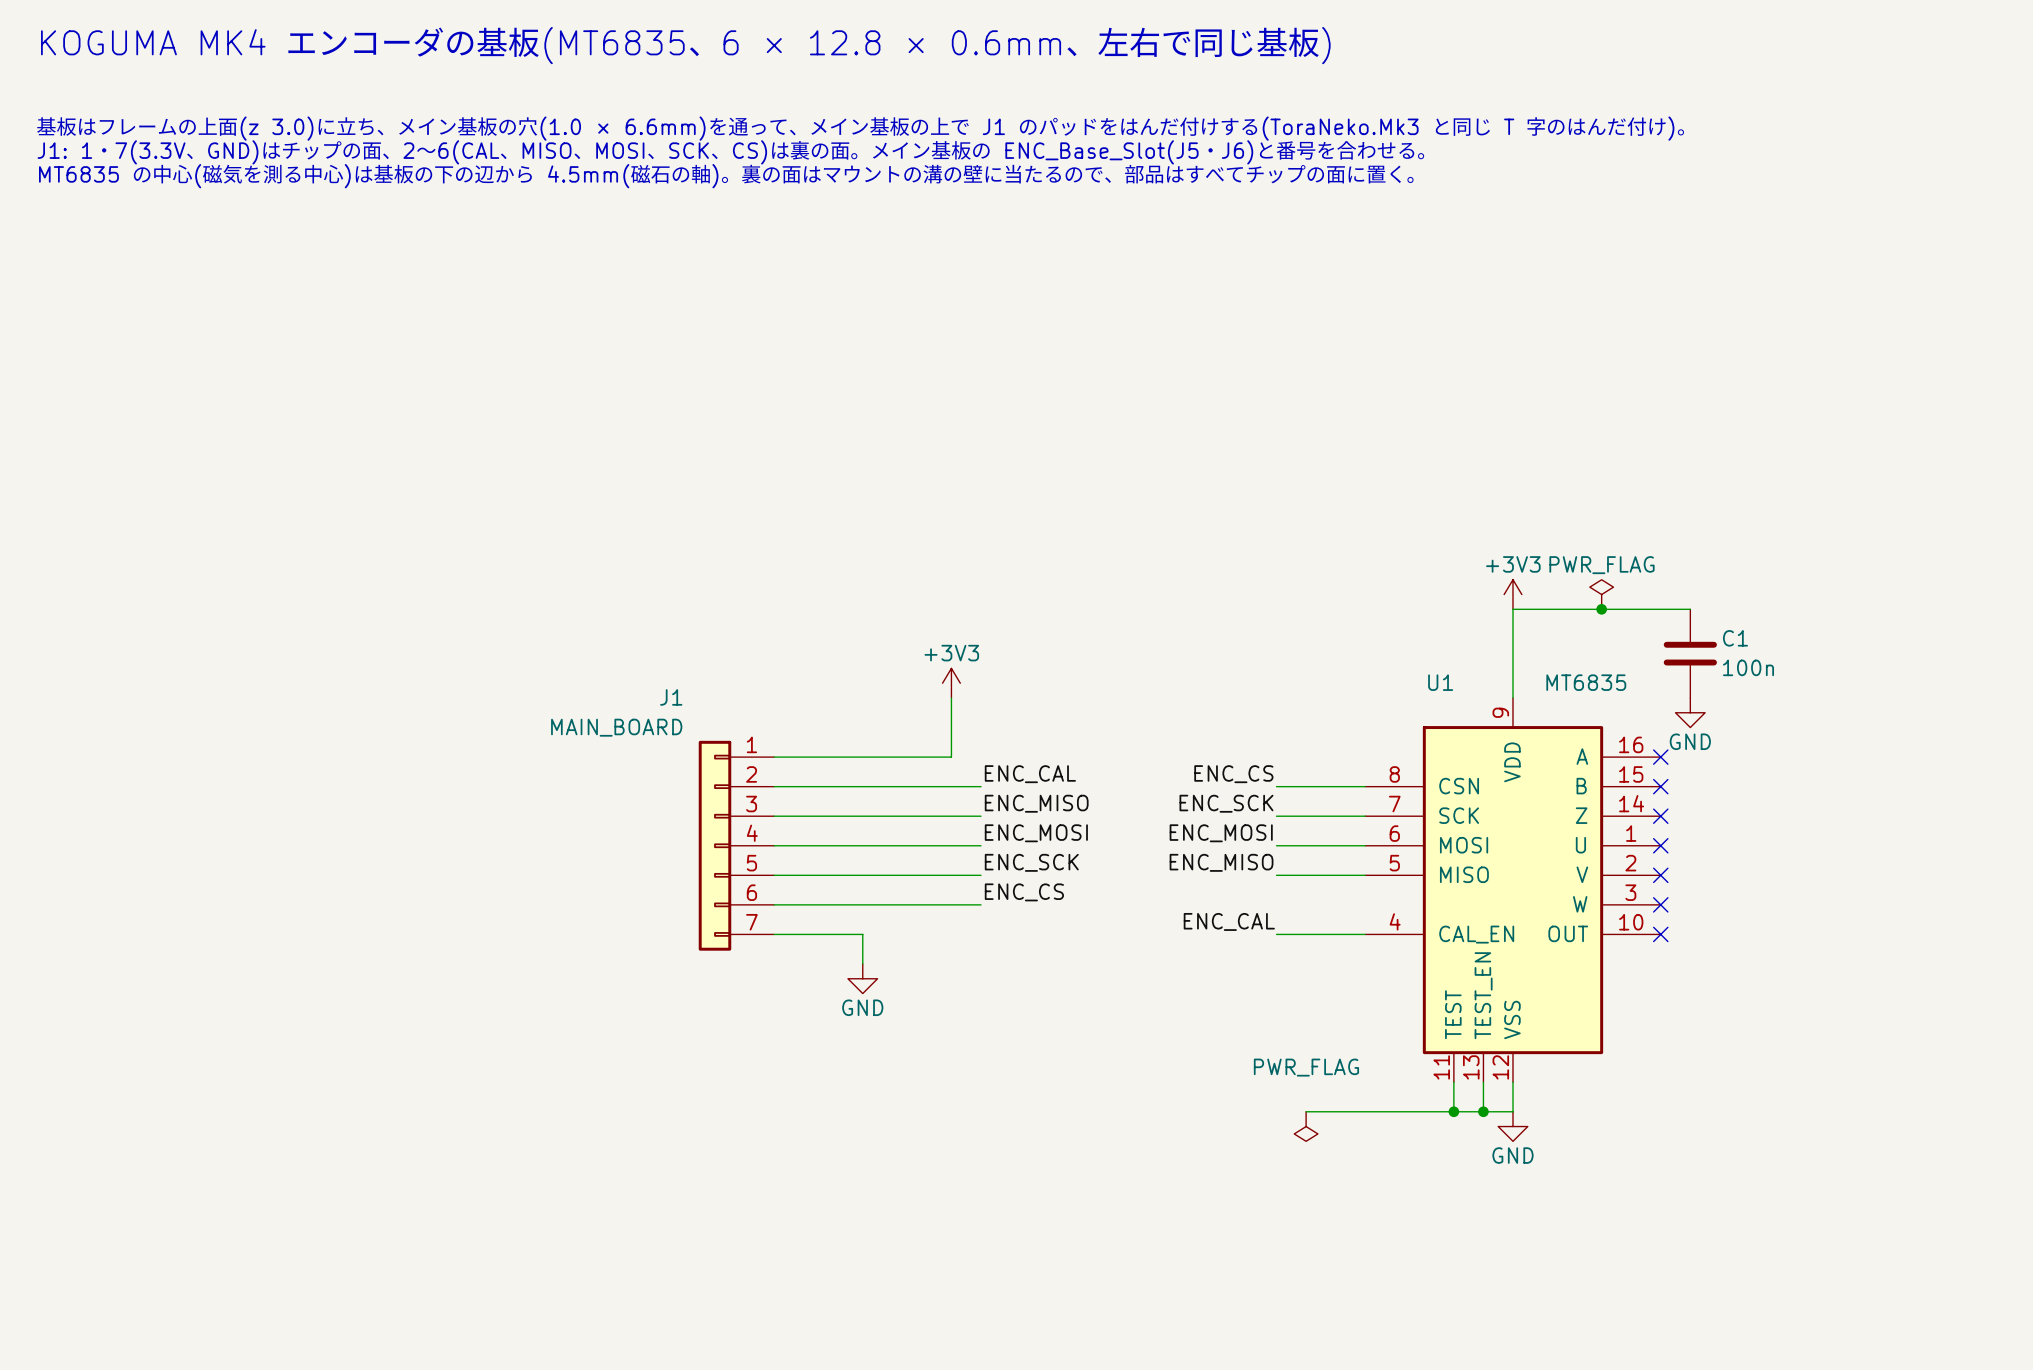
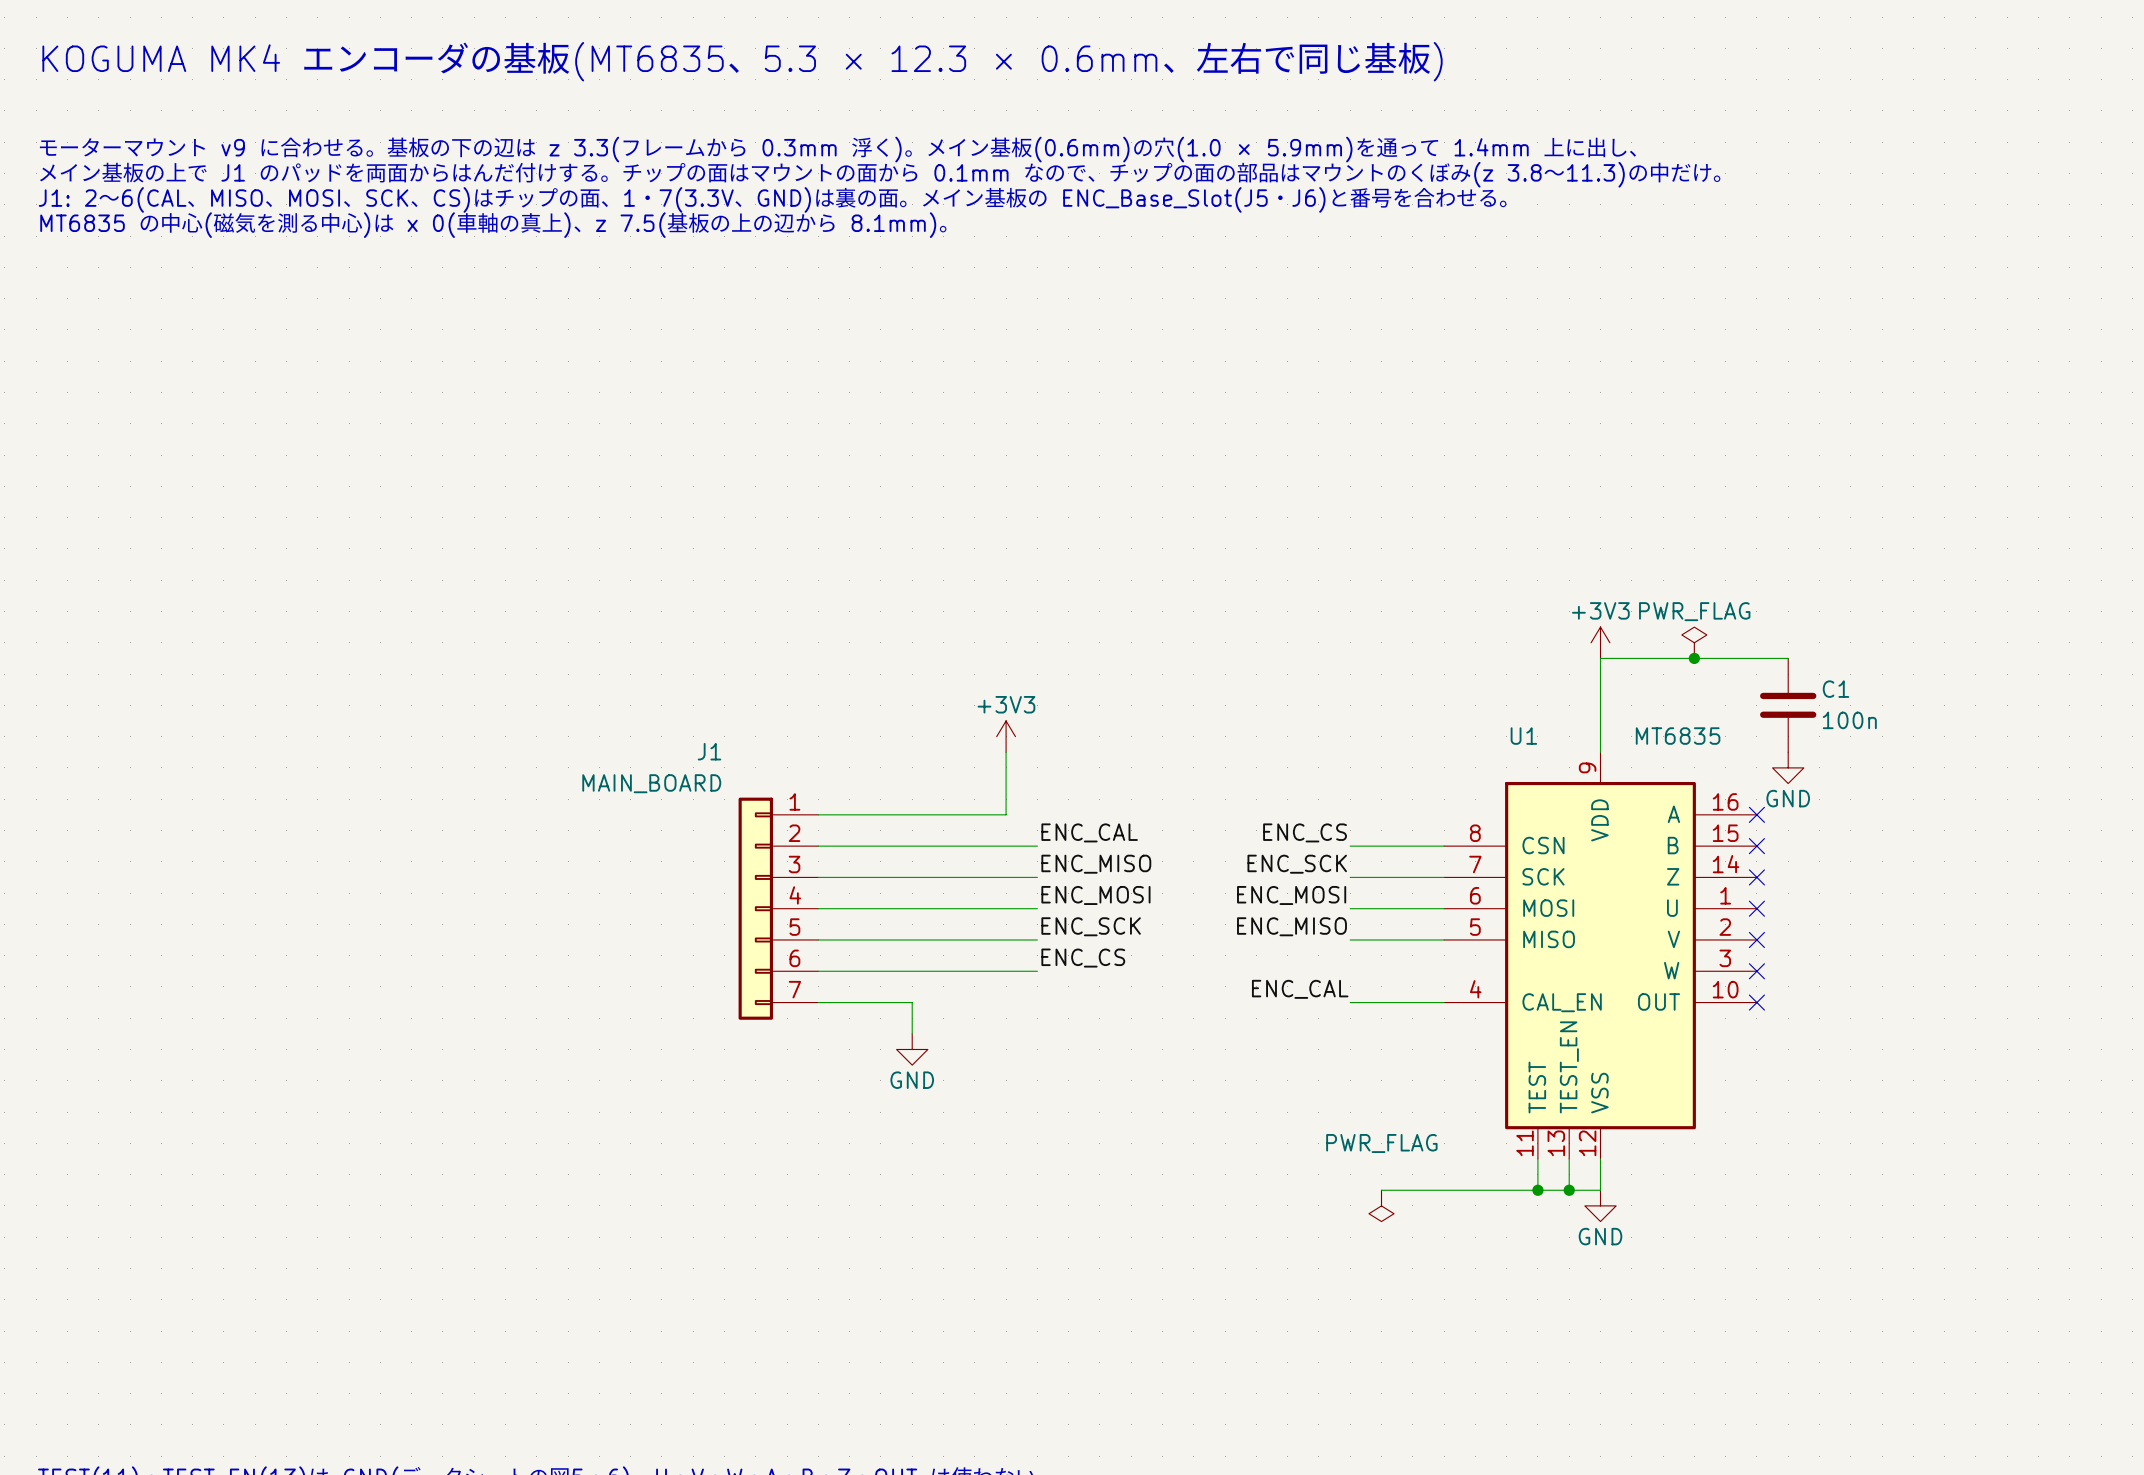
text: KOGUMA MK4 エンコーダの基板(MT6835、6 × 12.8 × 0.6mm、左右で同じ基板) (685, 45) -> KOGUMA MK4 エンコーダの基板(MT6835、5.3 × 12.3 × 0.6mm、左右で同じ基板) (742, 61)
text: 基板はフレームの上面(z 3.0)に立ち、メイン基板の穴(1.0 × 6.6mm)を通って、メイン基板の上で J1 のパッドをはんだ付けする(ToraNeko.Mk3 と同じ T 字のはんだ付け)。 (860, 128) -> モーターマウント v9 に合わせる。基板の下の辺は z 3.3(フレームから 0.3mm 浮く)。メイン基板(0.6mm)の穴(1.0 × 5.9mm)を通って 1.4mm 上に出し、 (837, 149)
text: J1: 1・7(3.3V、GND)はチップの面、2〜6(CAL、MISO、MOSI、SCK、CS)は裏の面。メイン基板の ENC_Base_Slot(J5・J6)と番号を合わせる。 (731, 152) -> メイン基板の上で J1 のパッドを両面からはんだ付けする。チップの面はマウントの面から 0.1mm なので、チップの面の部品はマウントのくぼみ(z 3.8〜11.3)の中だけ。 (880, 174)
text: MT6835 の中心(磁気を測る中心)は基板の下の辺から 4.5mm(磁石の軸)。裏の面はマウントの溝の壁に当たるので、部品はすべてチップの面に置く。 (726, 176) -> J1: 2〜6(CAL、MISO、MOSI、SCK、CS)はチップの面、1・7(3.3V、GND)は裏の面。メイン基板の ENC_Base_Slot(J5・J6)と番号を合わせる。 (773, 199)
text: none -> MT6835 の中心(磁気を測る中心)は x 0(車軸の真上)、z 7.5(基板の上の辺から 8.1mm)。 (493, 225)

